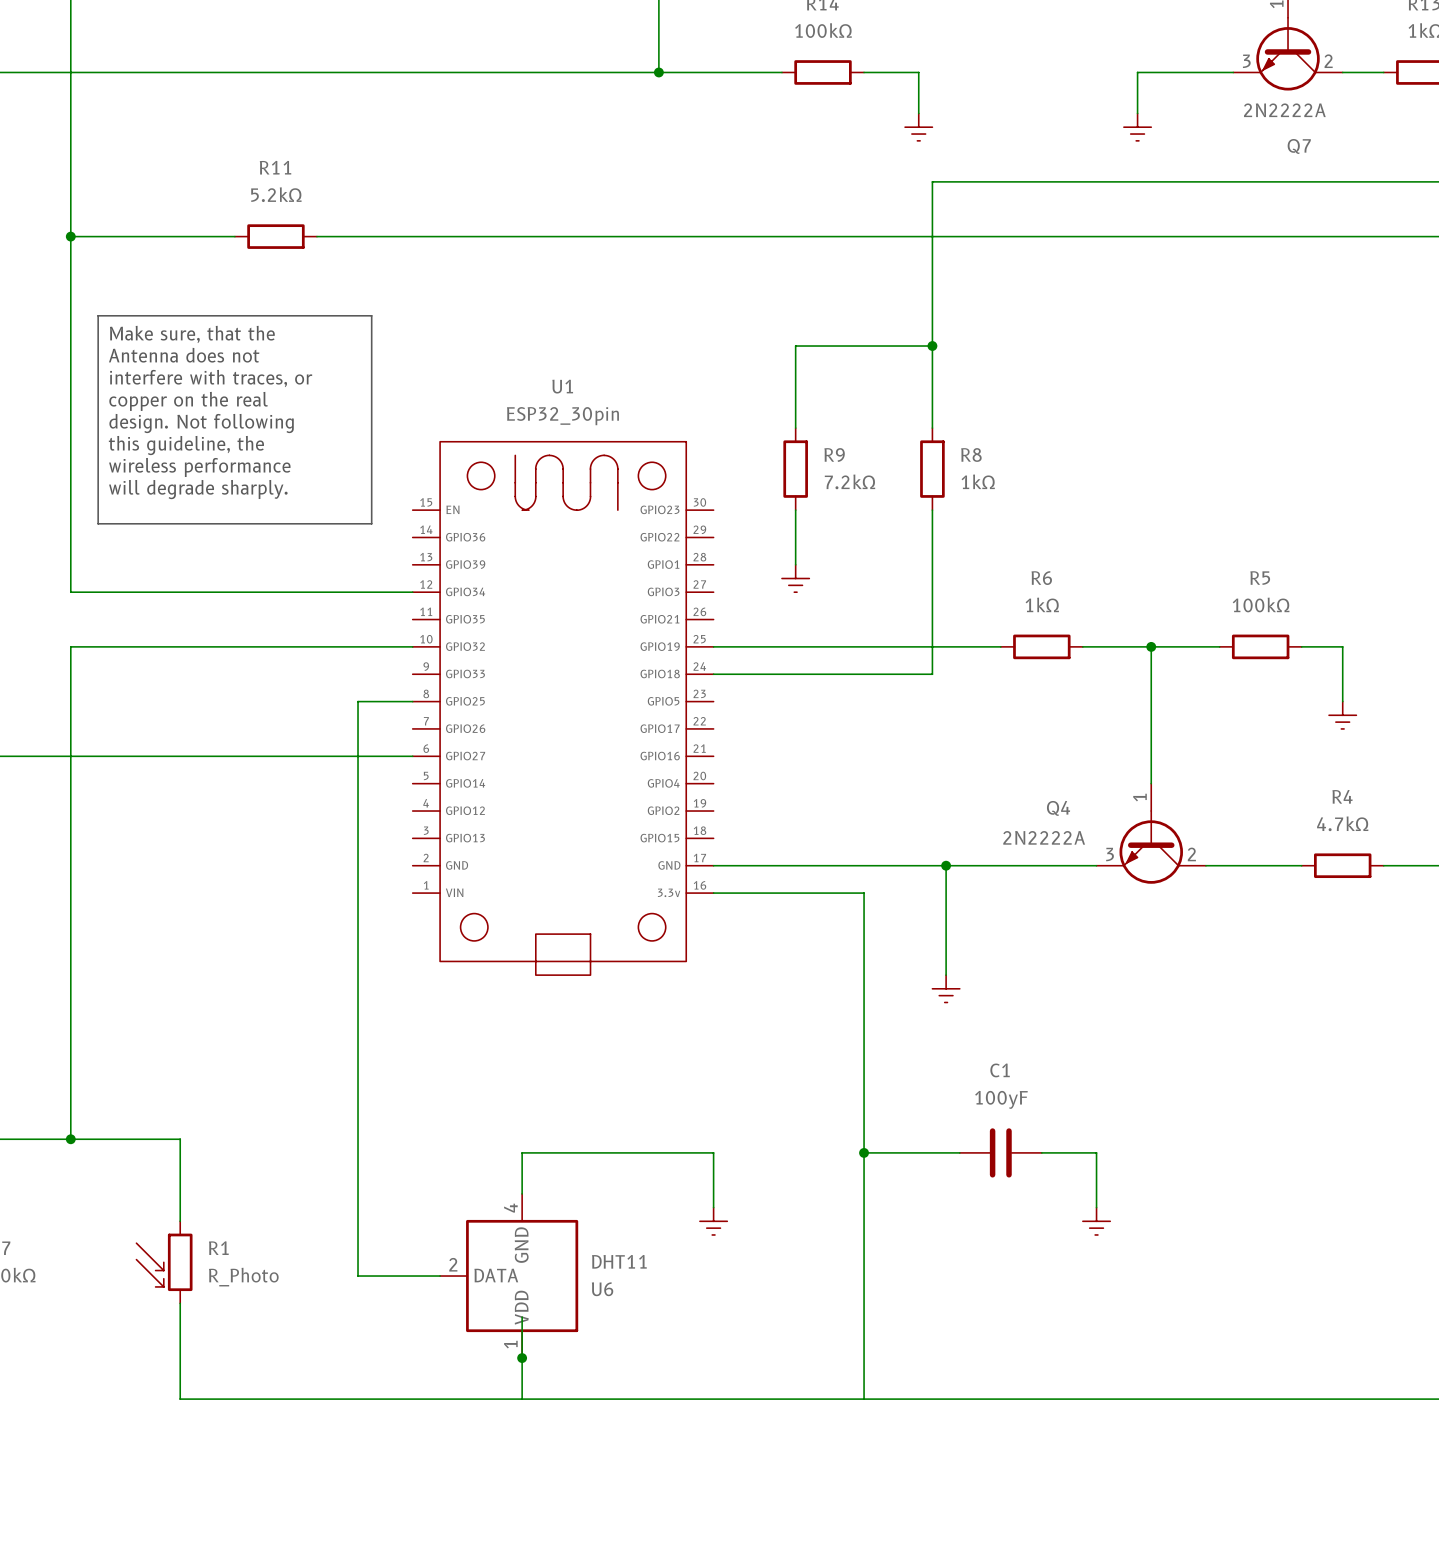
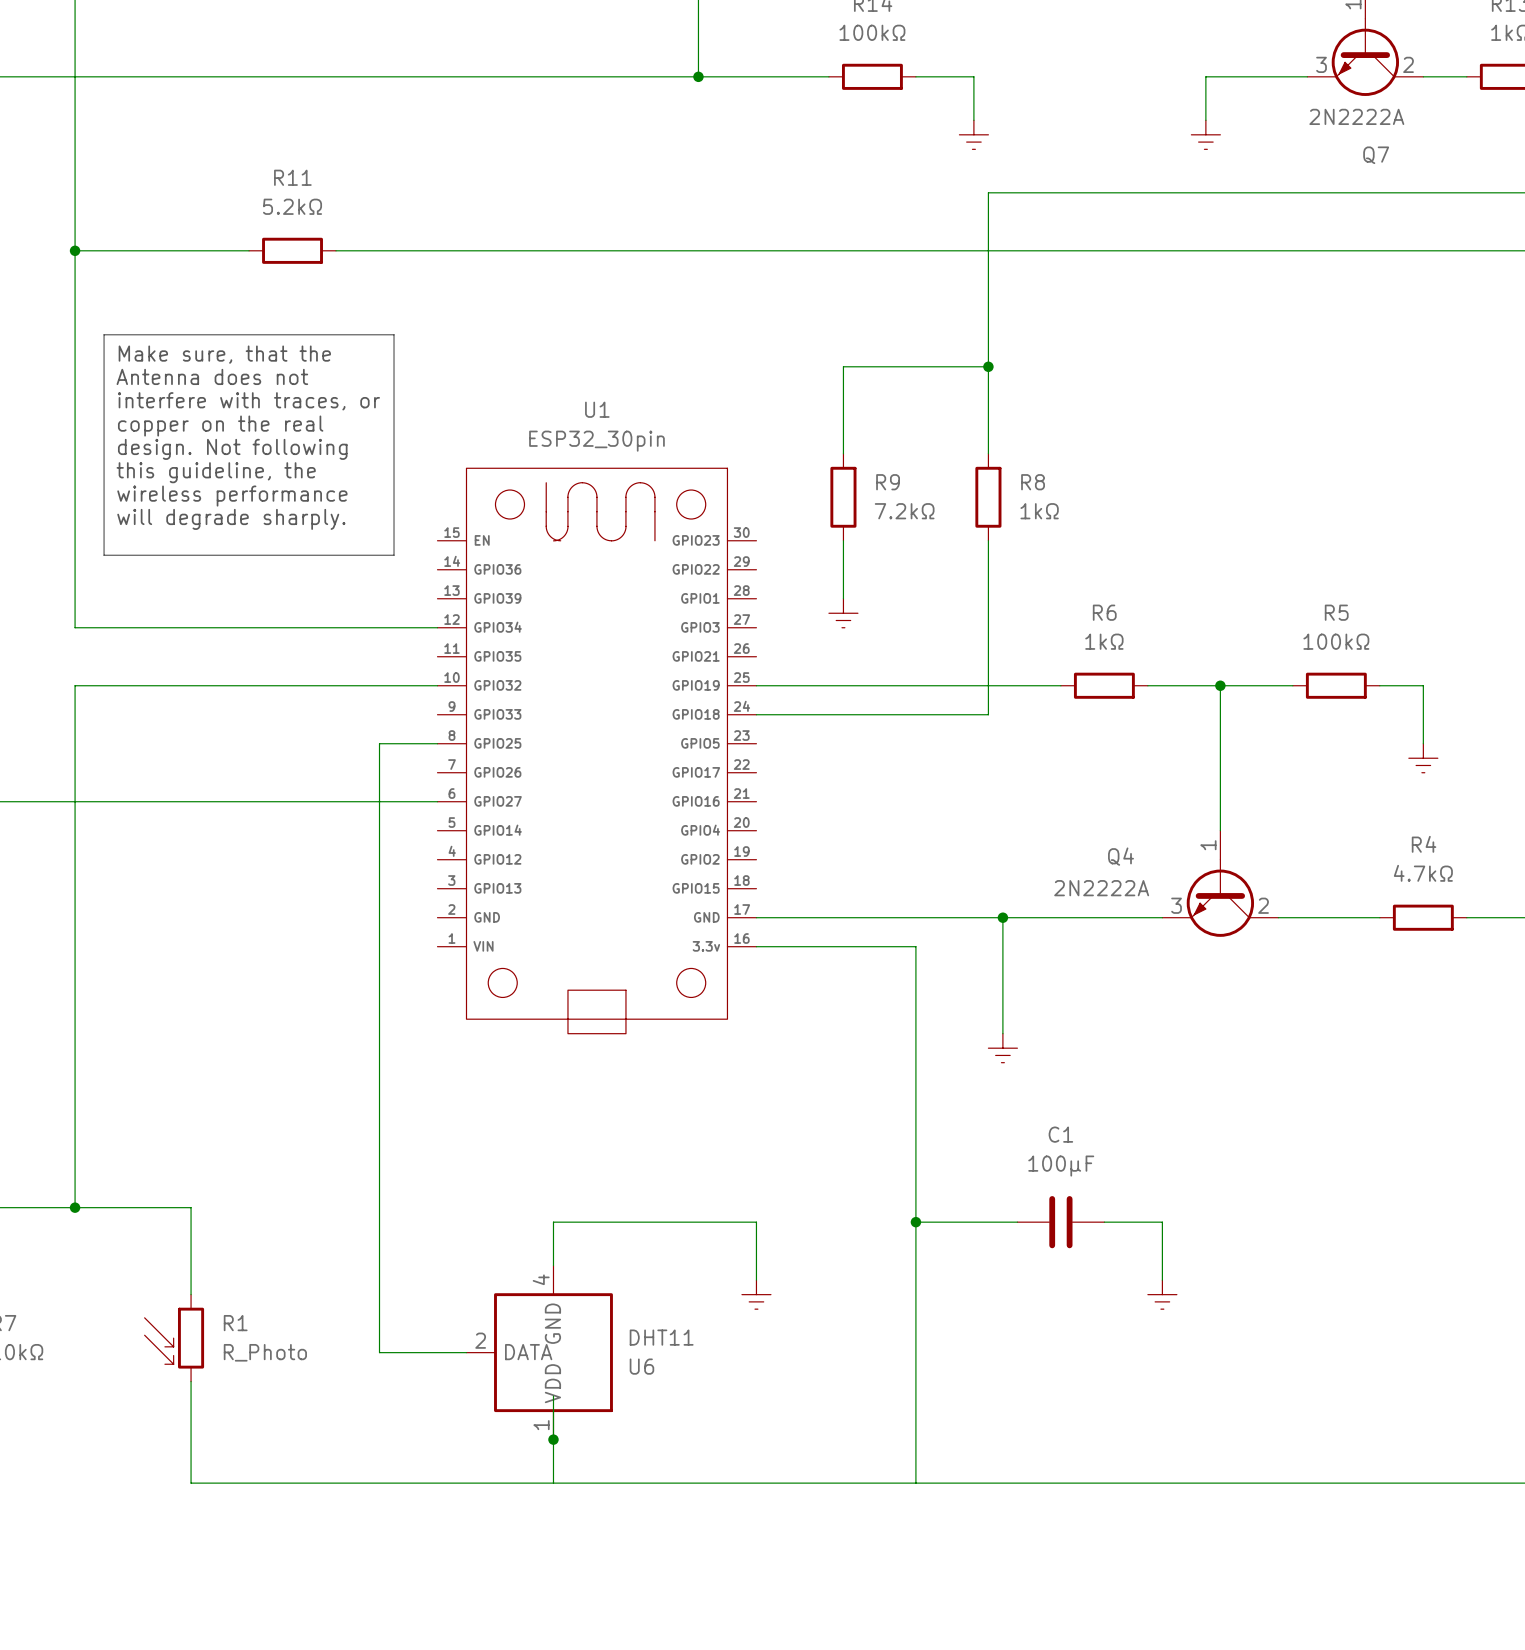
C1 value: 100yF (1001, 1099) -> 100µF (1061, 1166)

